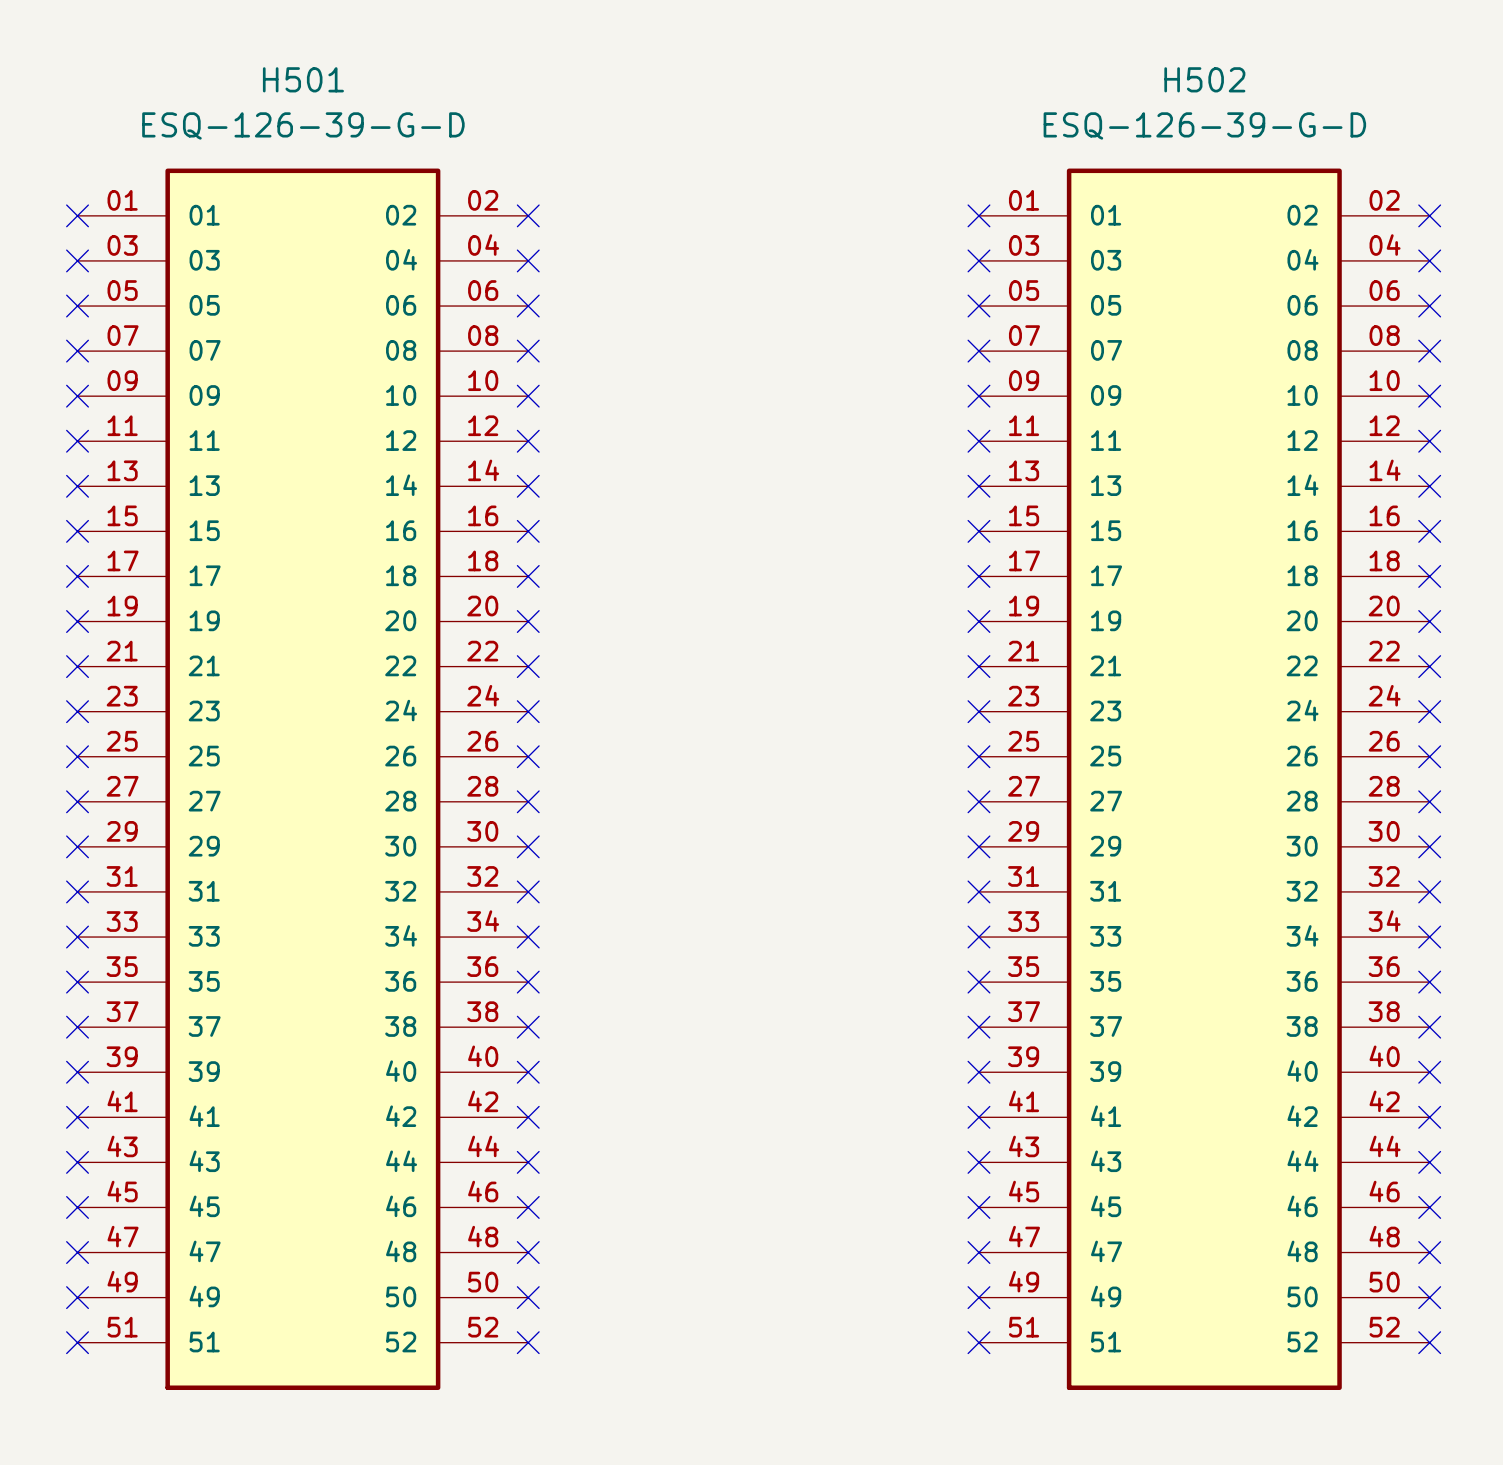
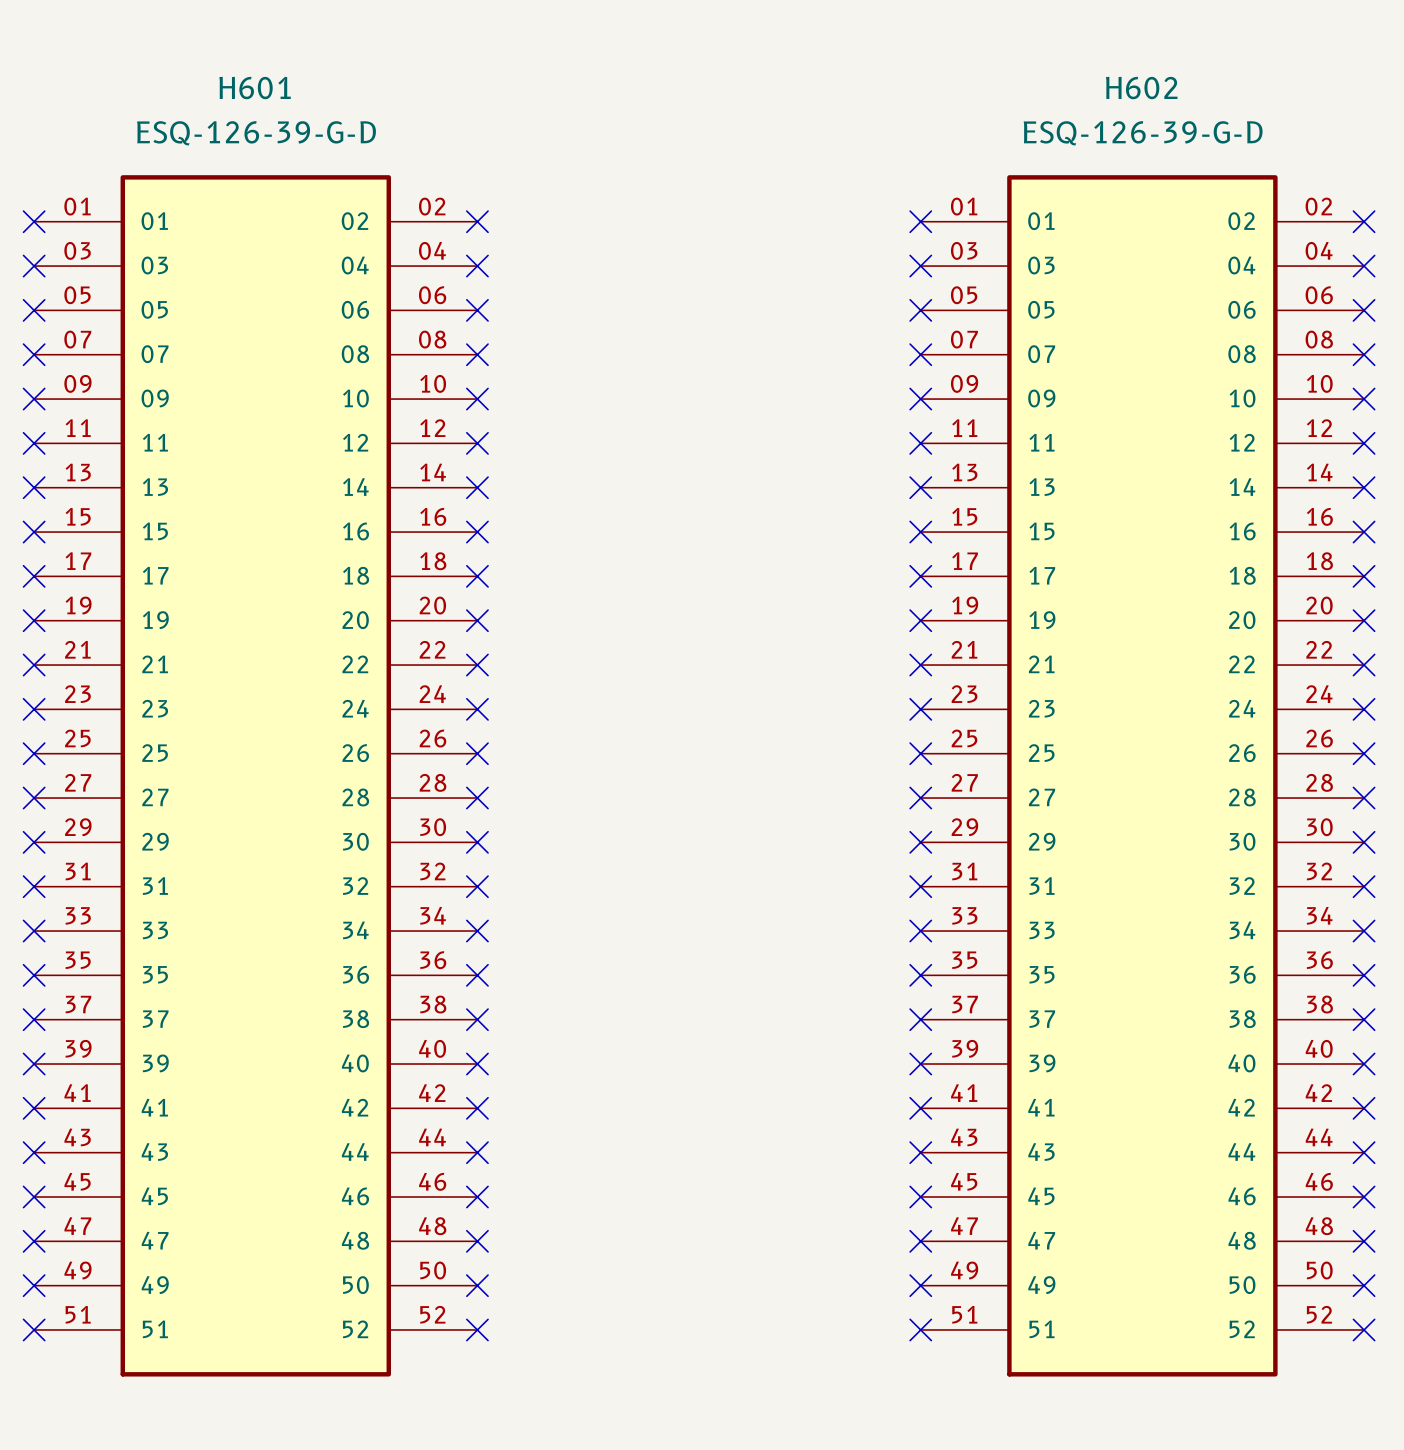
H501 name: H501 (303, 79) -> H601 (255, 88)
H502 name: H502 (1204, 79) -> H602 (1141, 88)

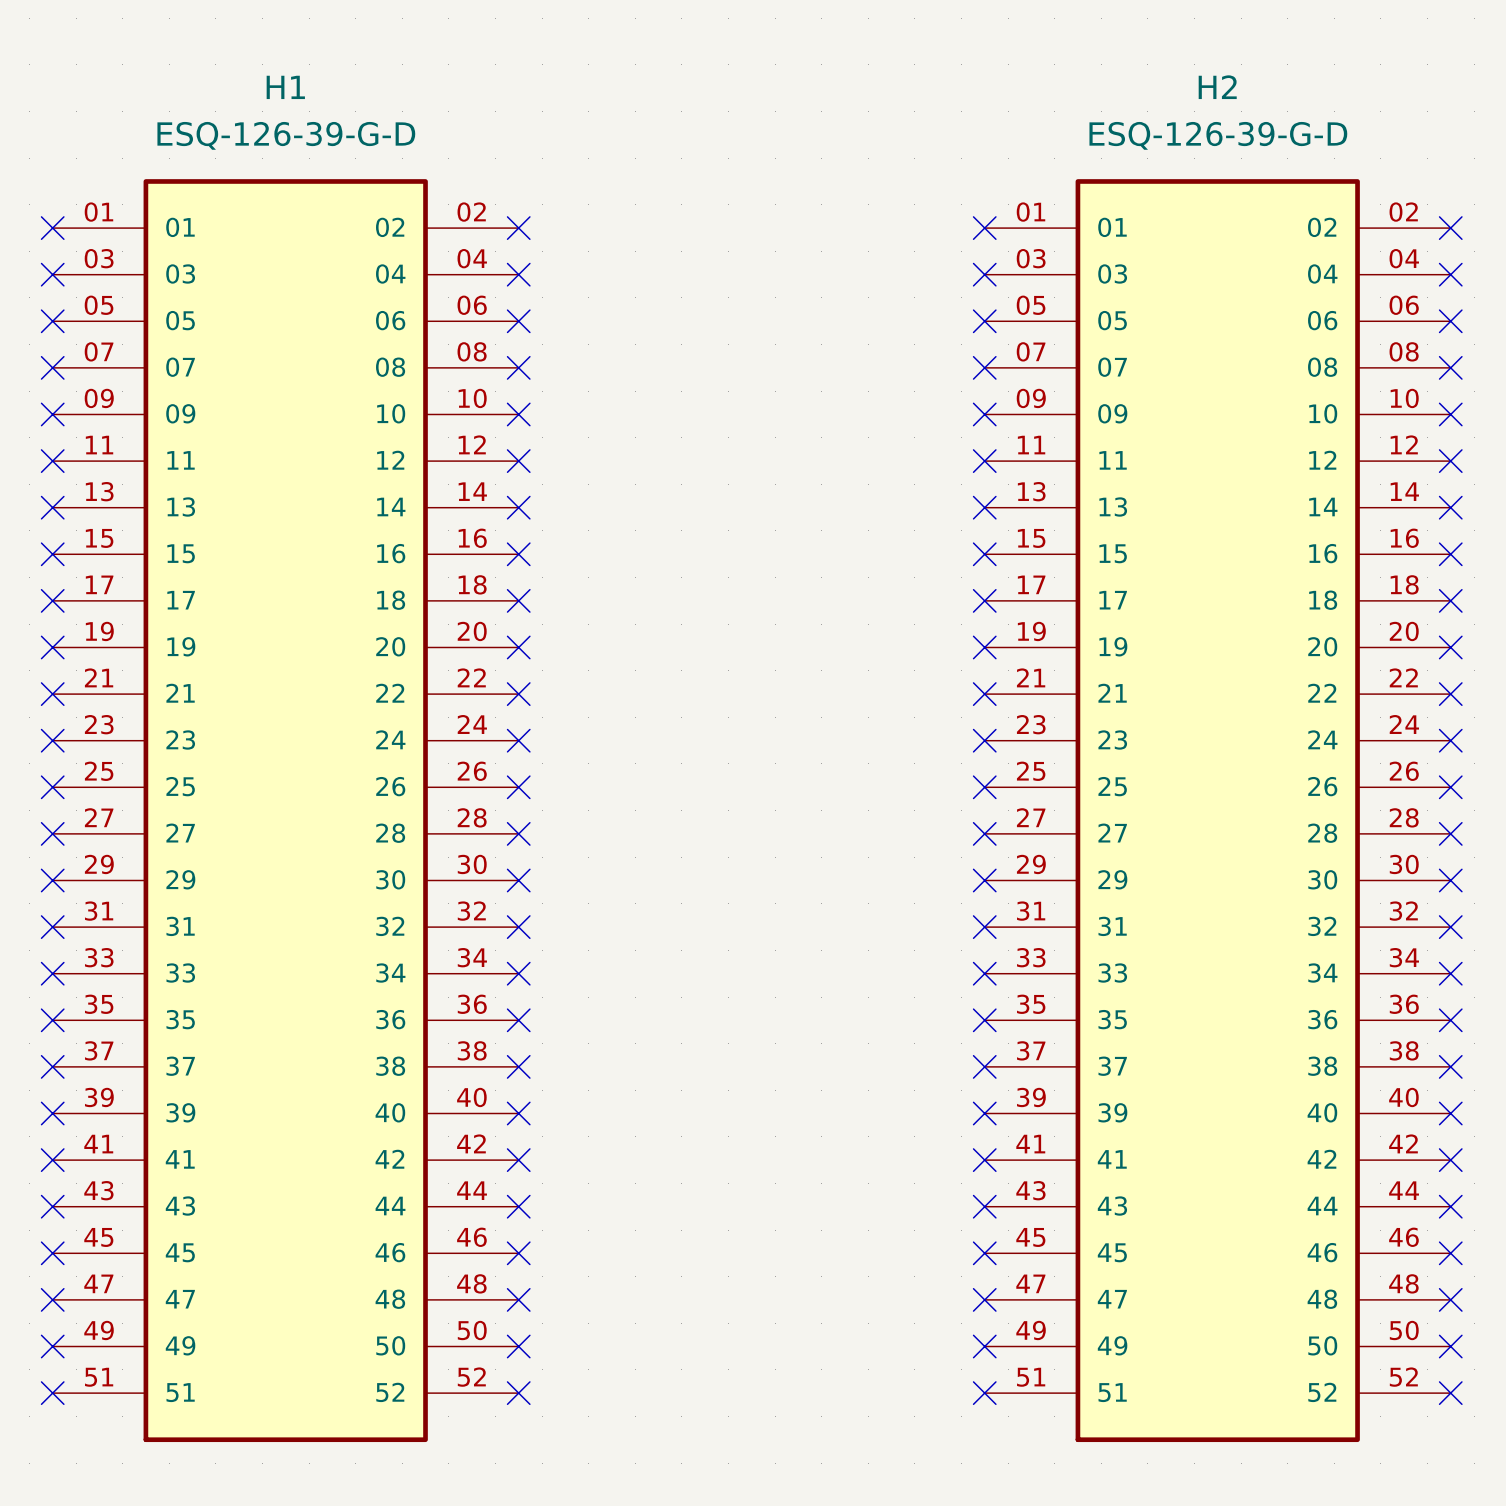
H601 name: H601 (255, 88) -> H1 (285, 87)
H602 name: H602 (1141, 88) -> H2 (1217, 87)

